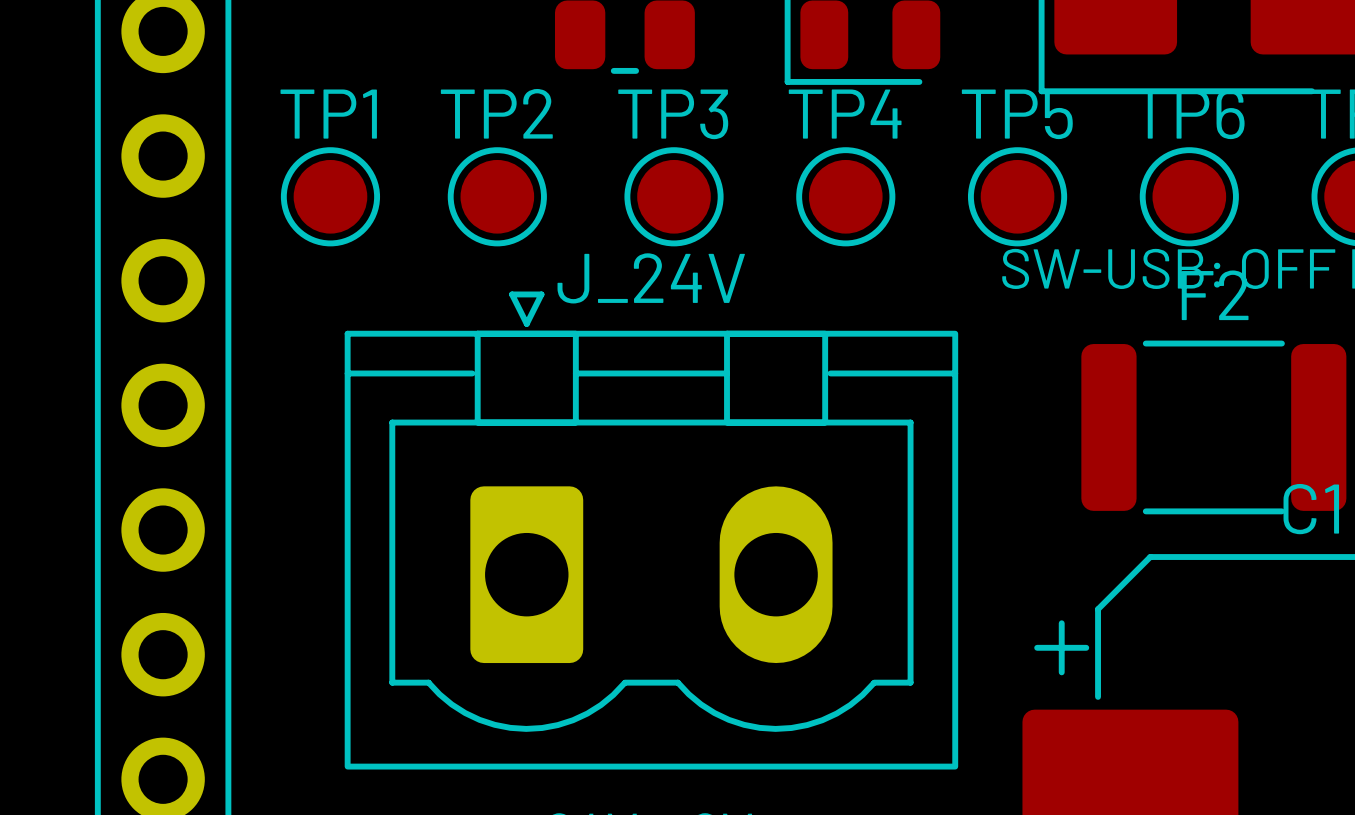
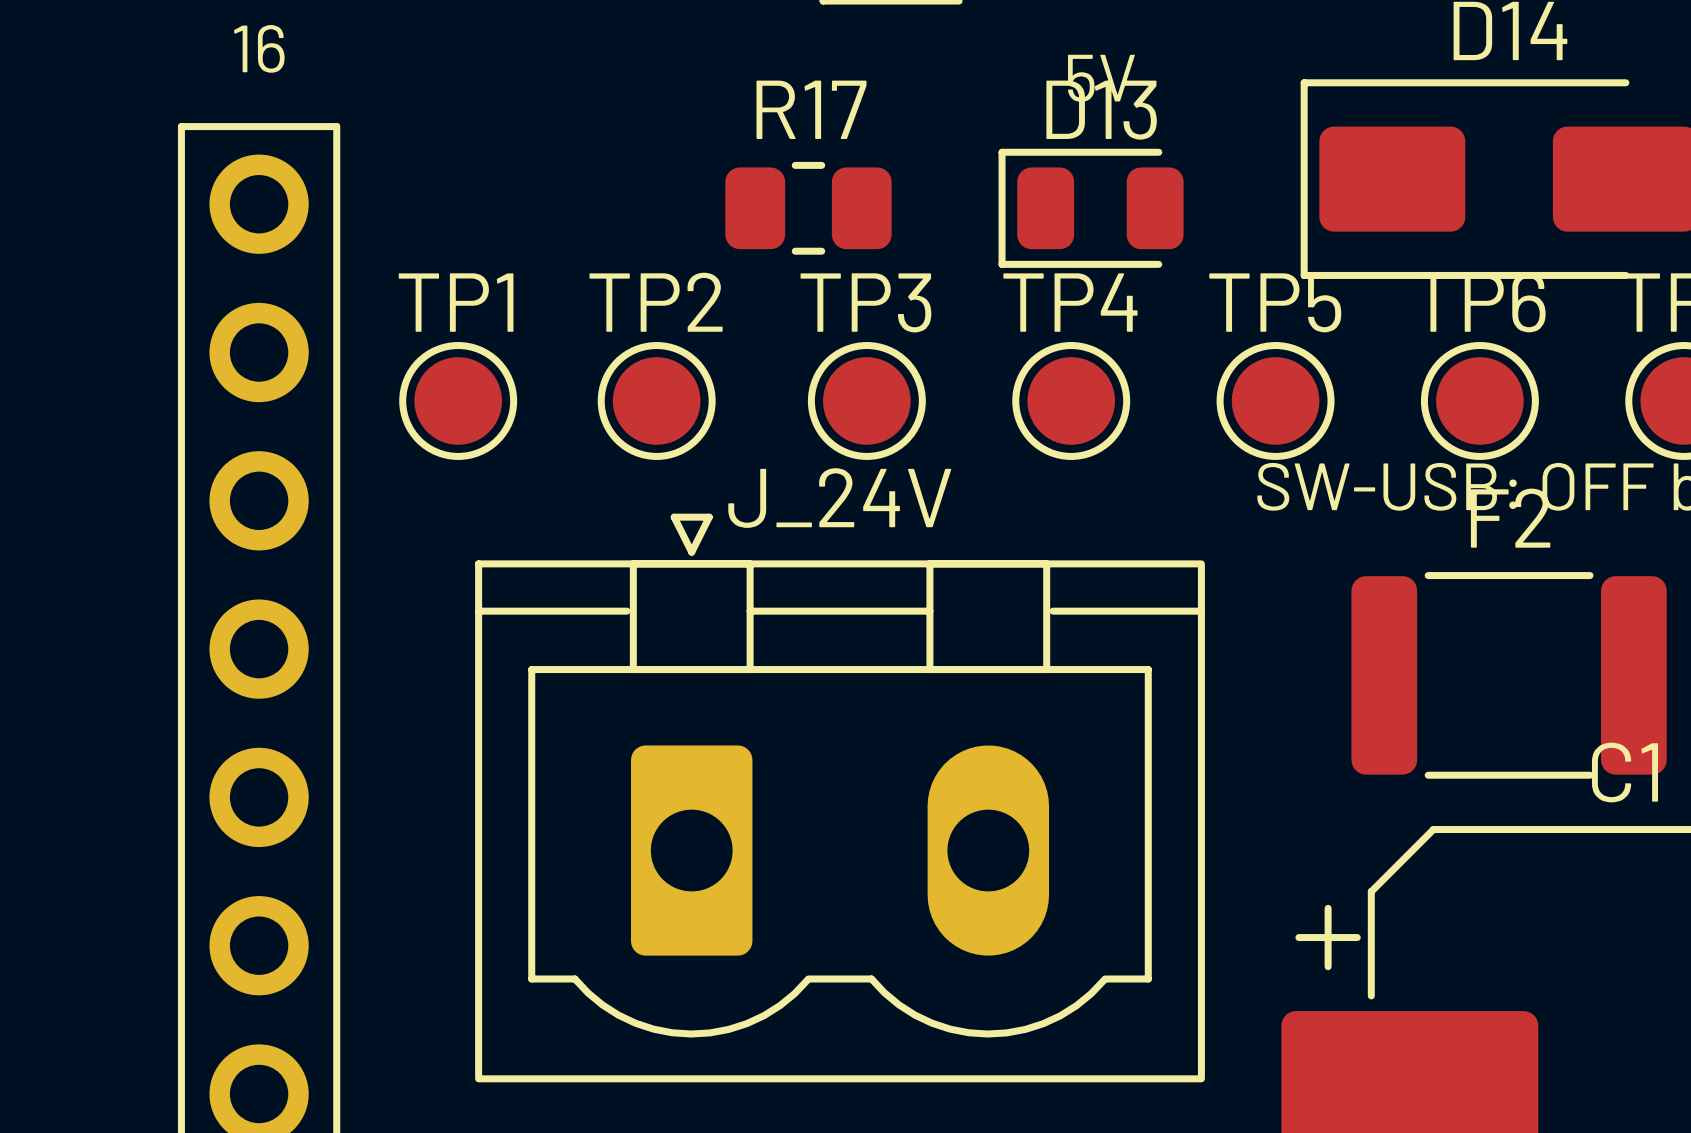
J_24V footprint: [344, 291, 959, 770] -> [475, 513, 1205, 1083]

